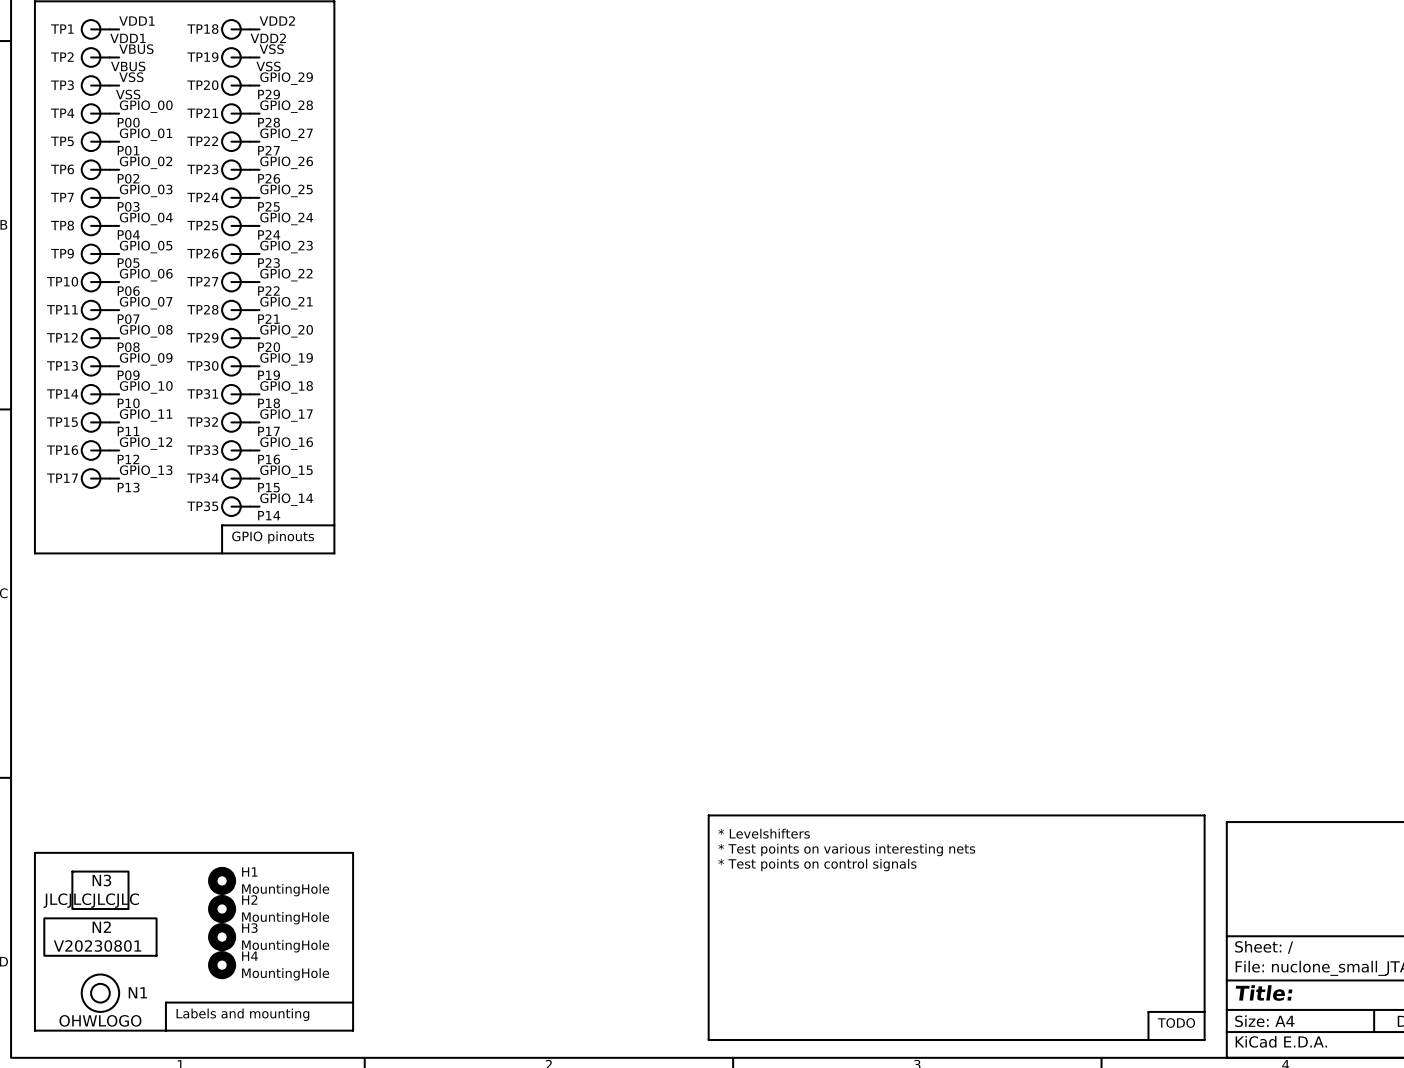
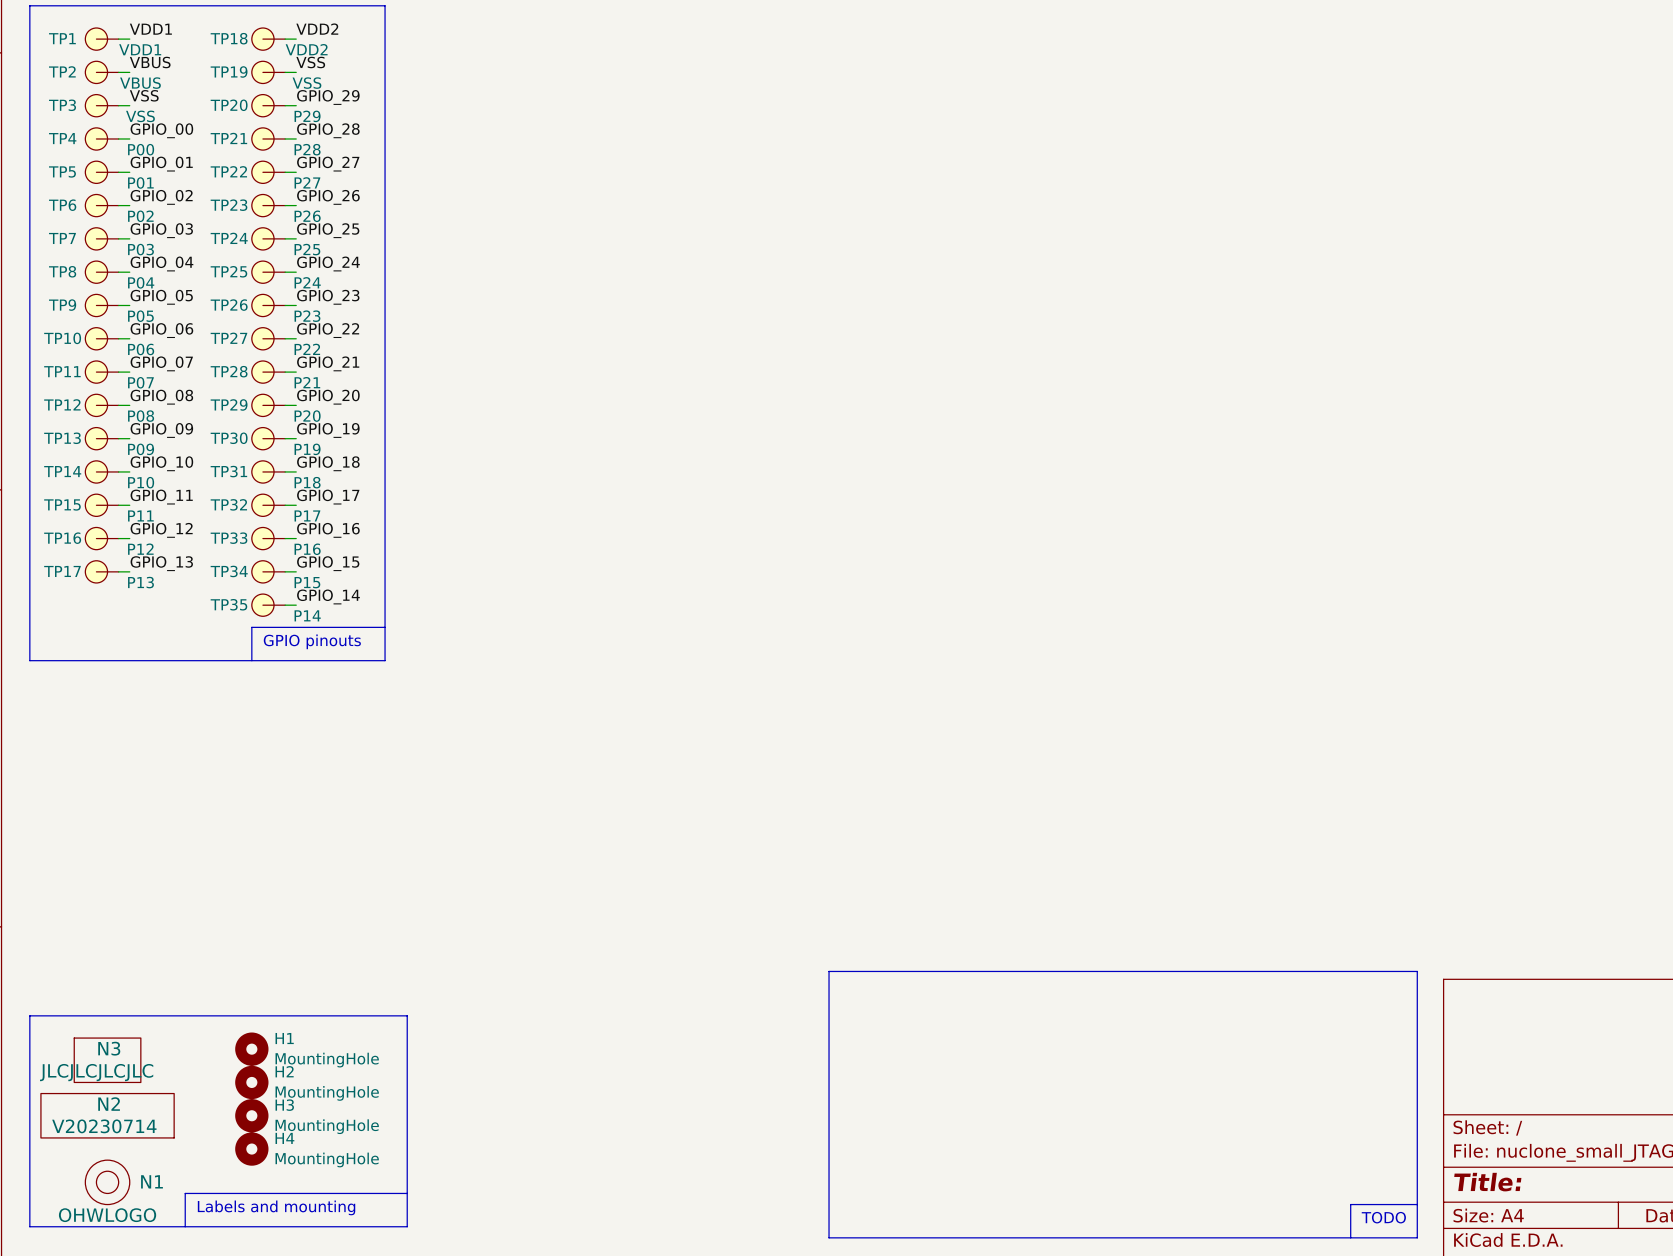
text: * Levelshifters (764, 833) -> none
text: * Test points on various interesting nets (846, 849) -> none
text: * Test points on control signals (817, 865) -> none
N2 value: V20230801 (97, 946) -> V20230714 (104, 1126)

